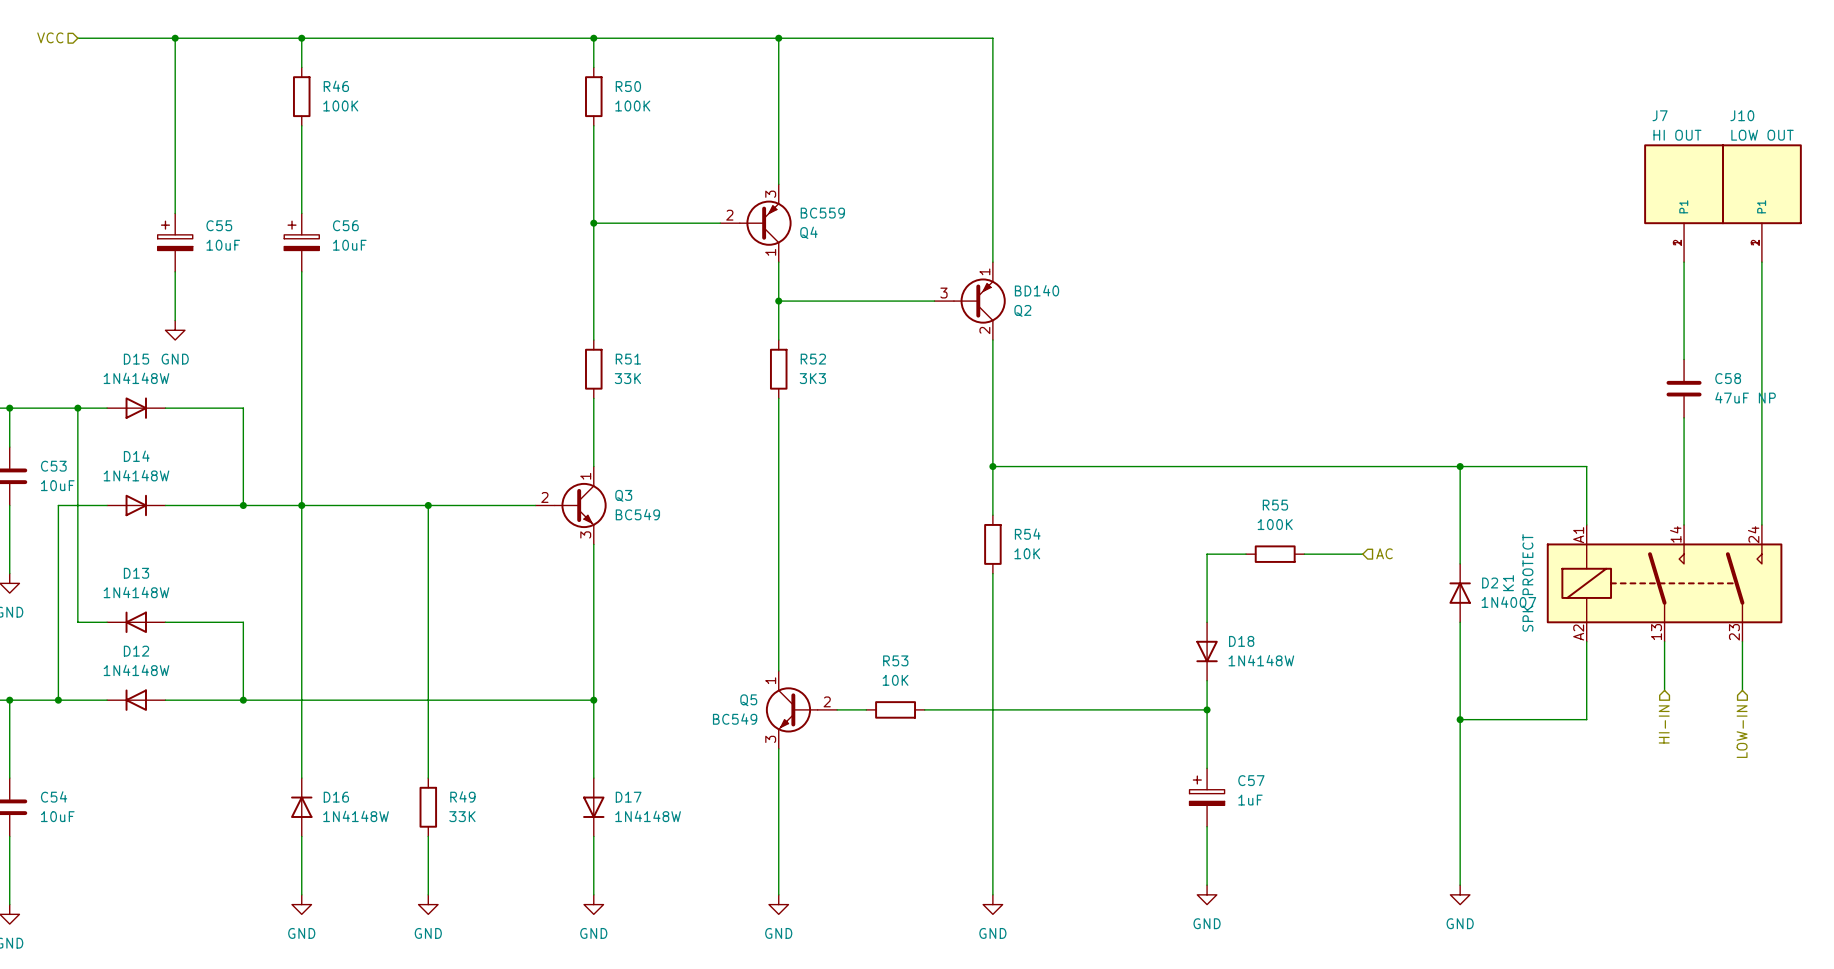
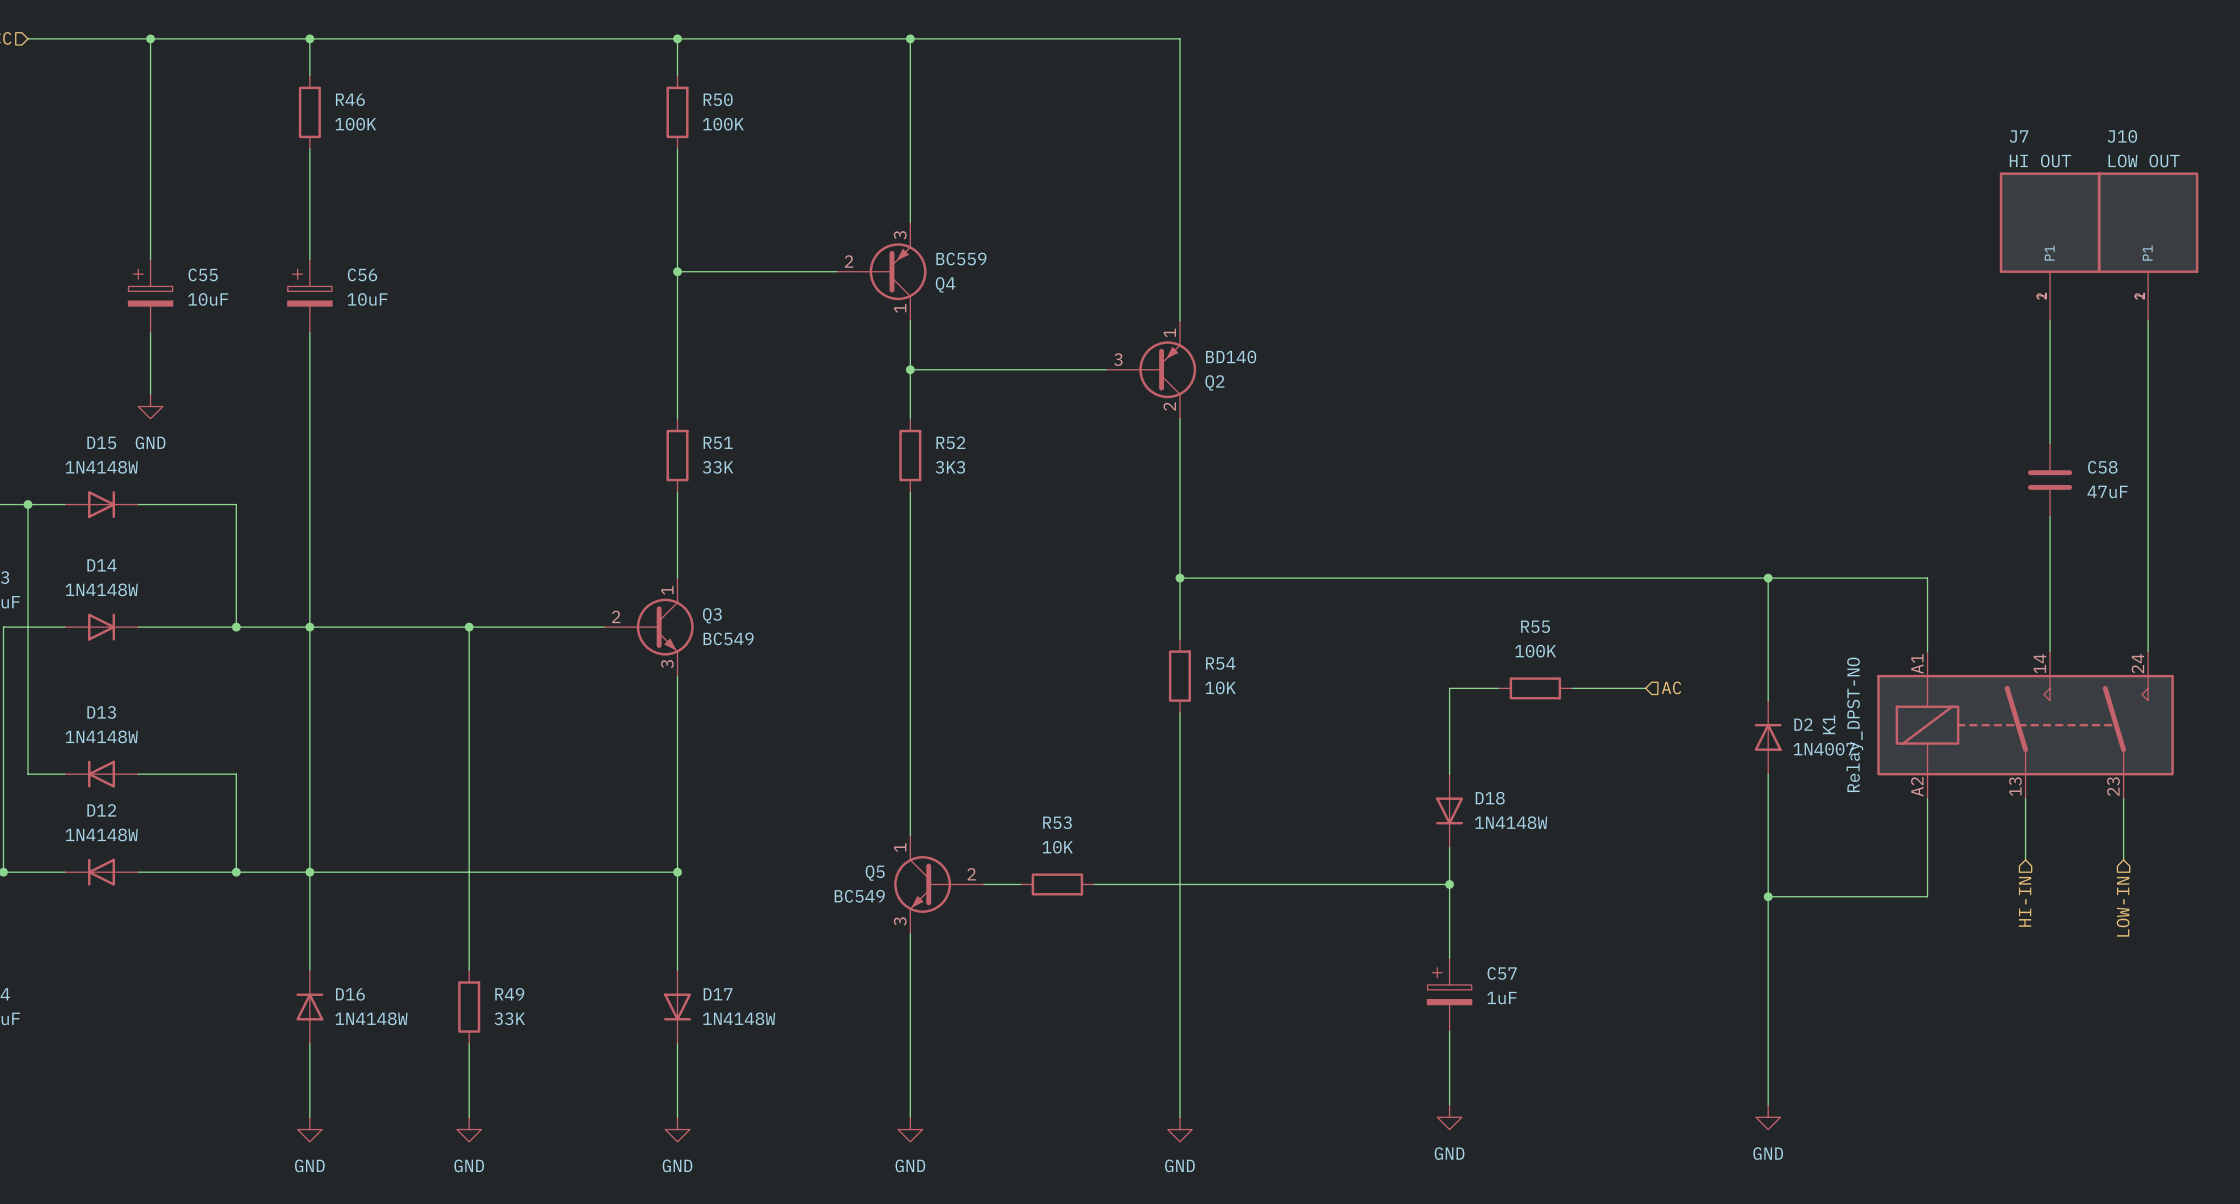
C58 value: 47uF NP (1745, 397) -> 47uF (2107, 491)
K1 value: SPK PROTECT (1527, 582) -> Relay_DPST-NO (1854, 724)
junction: none -> (309, 872)

